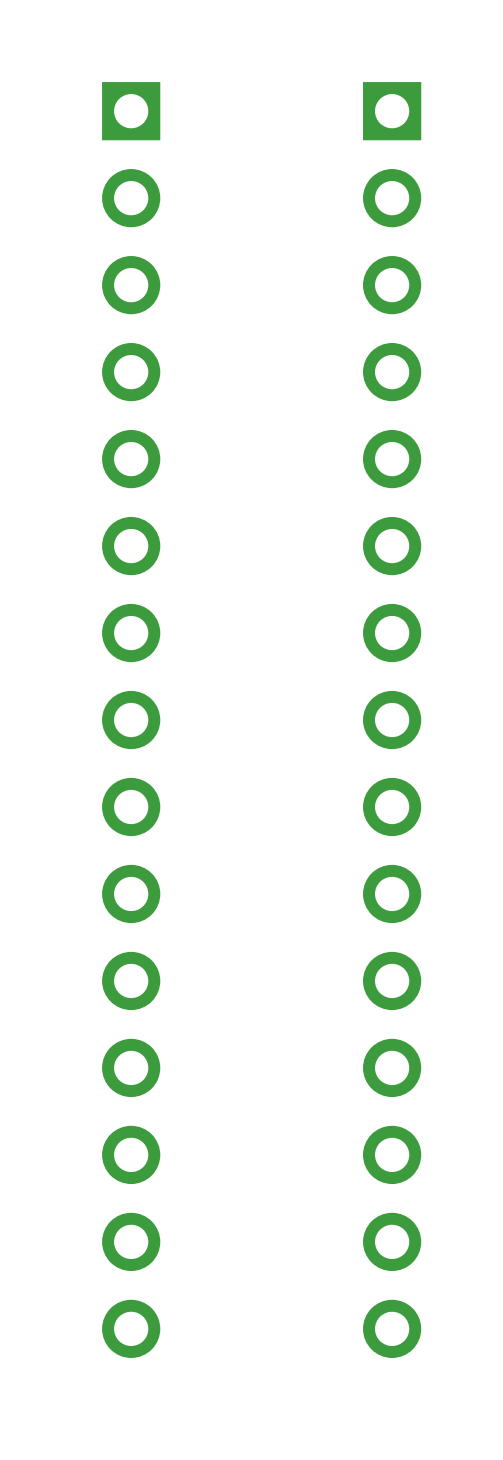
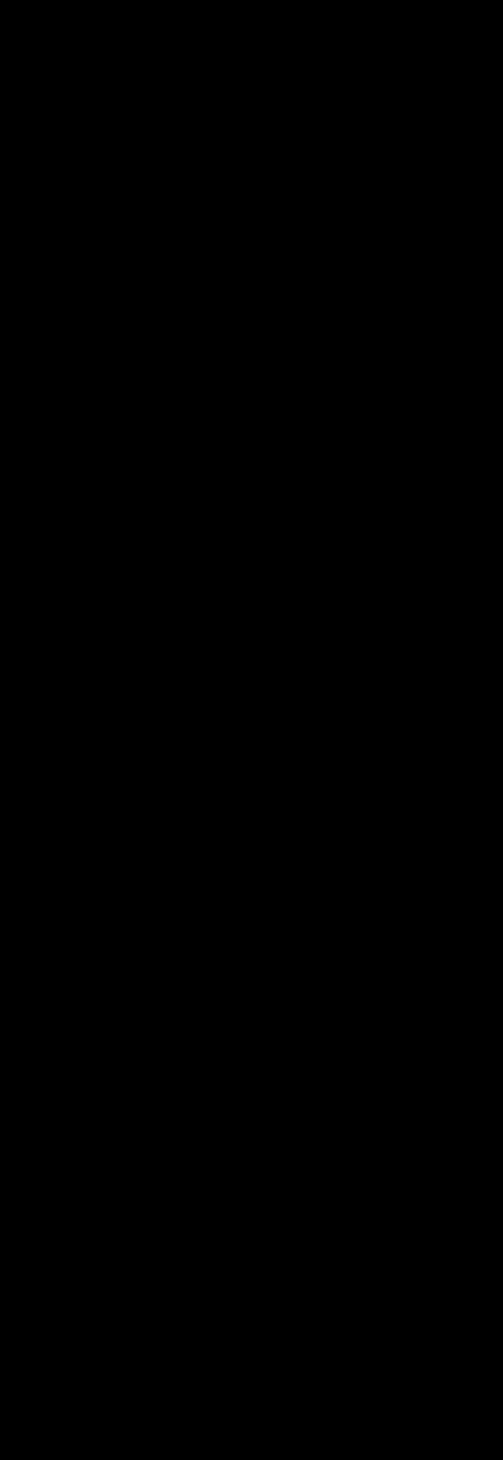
part: (131, 720) -> none
part: (392, 720) -> none

